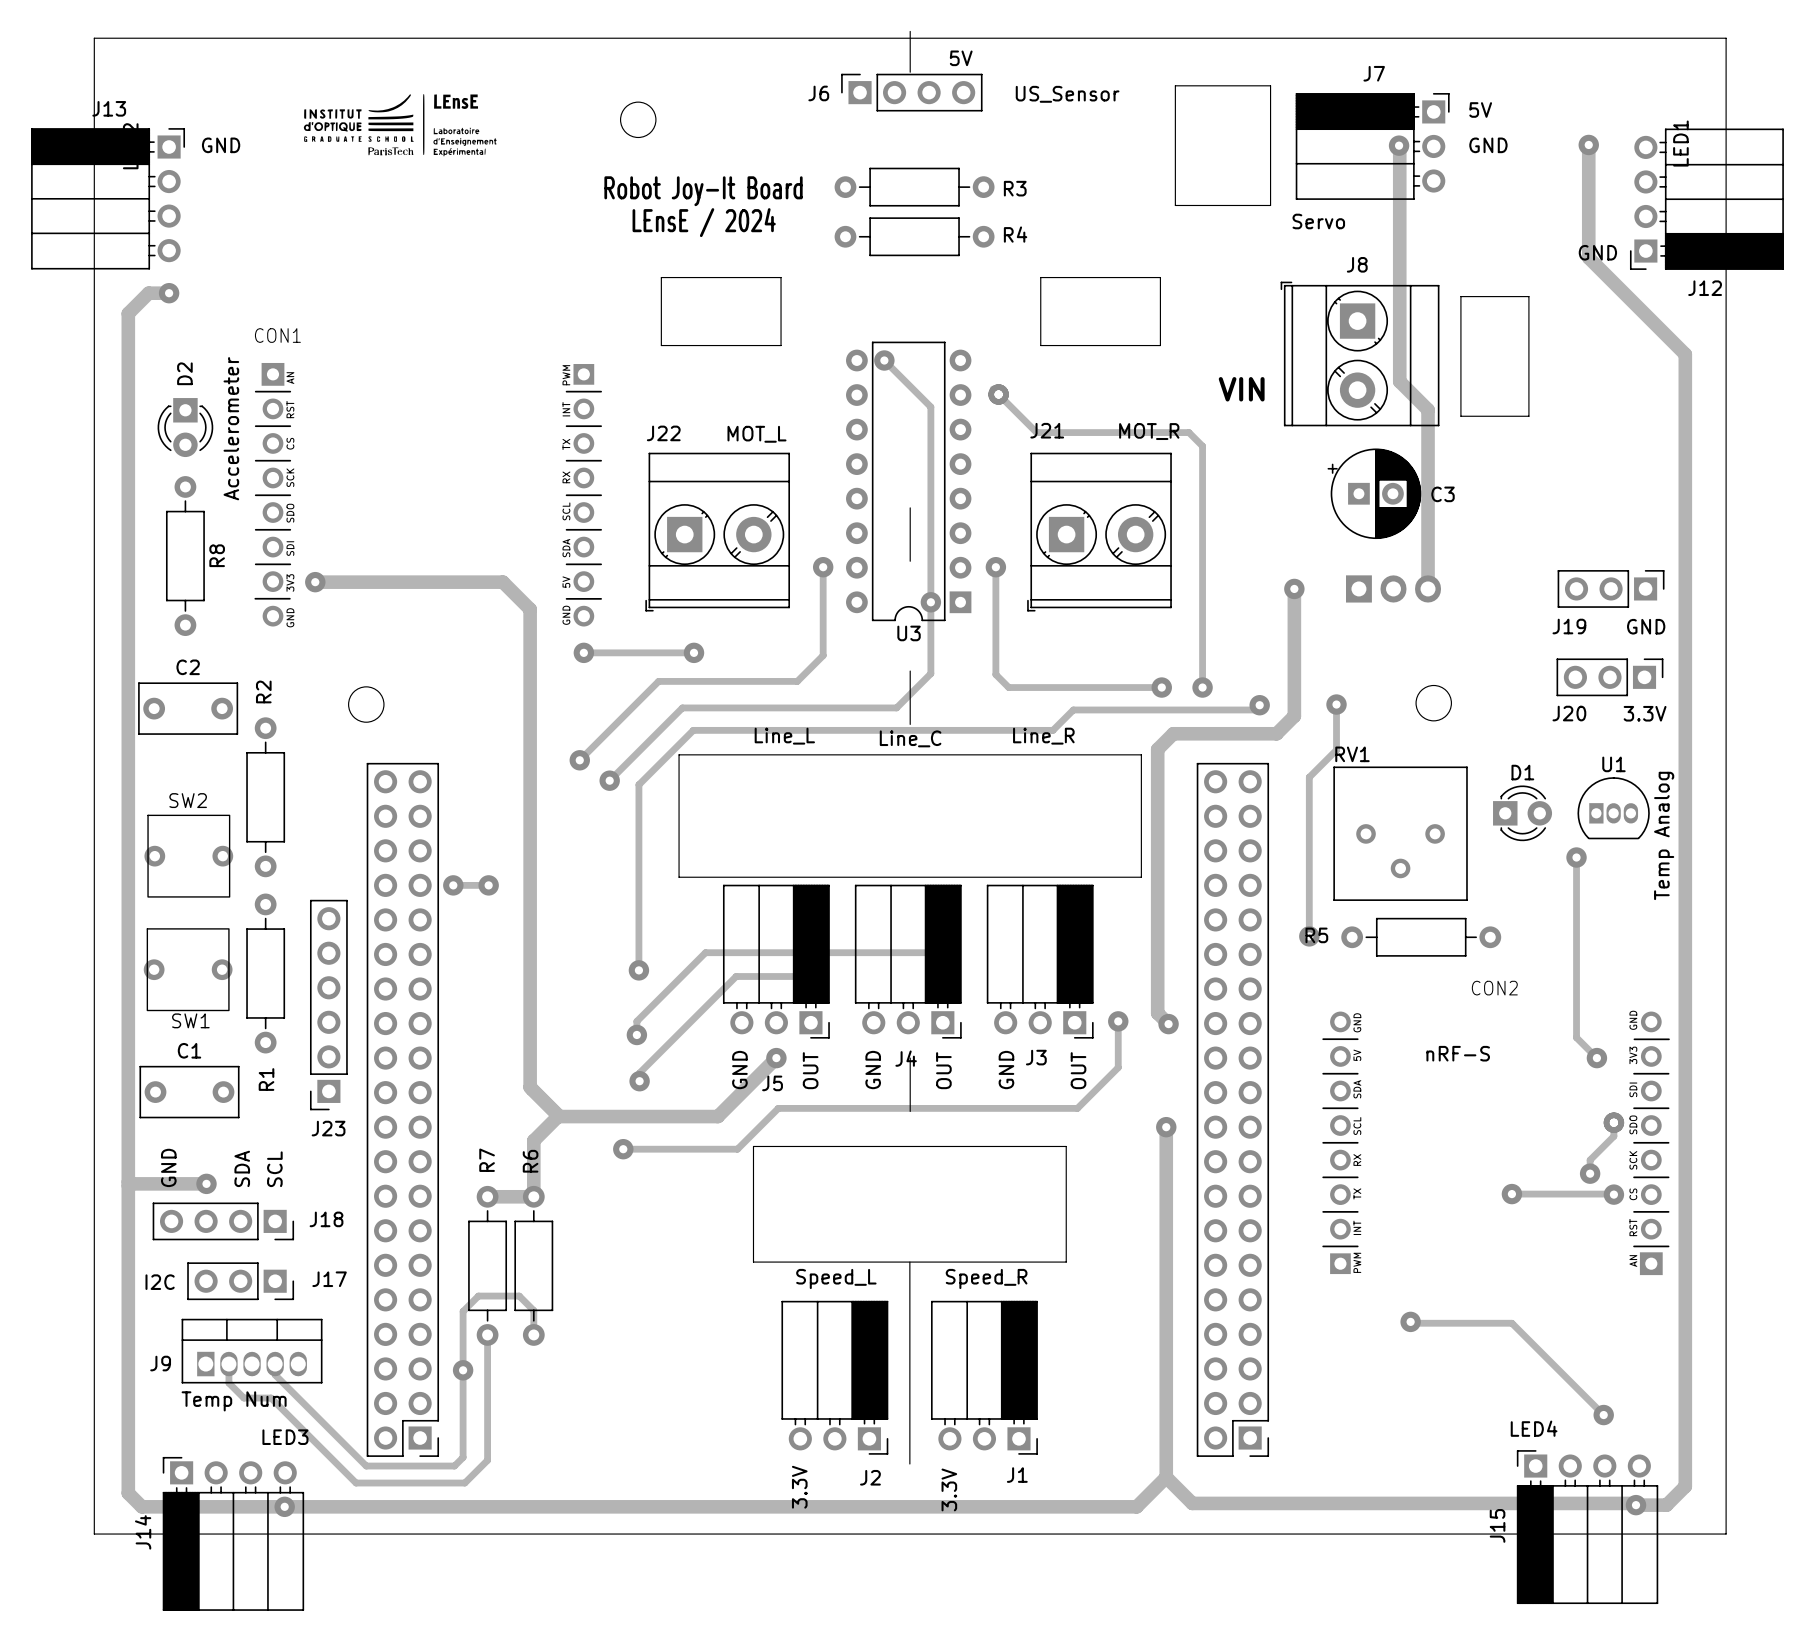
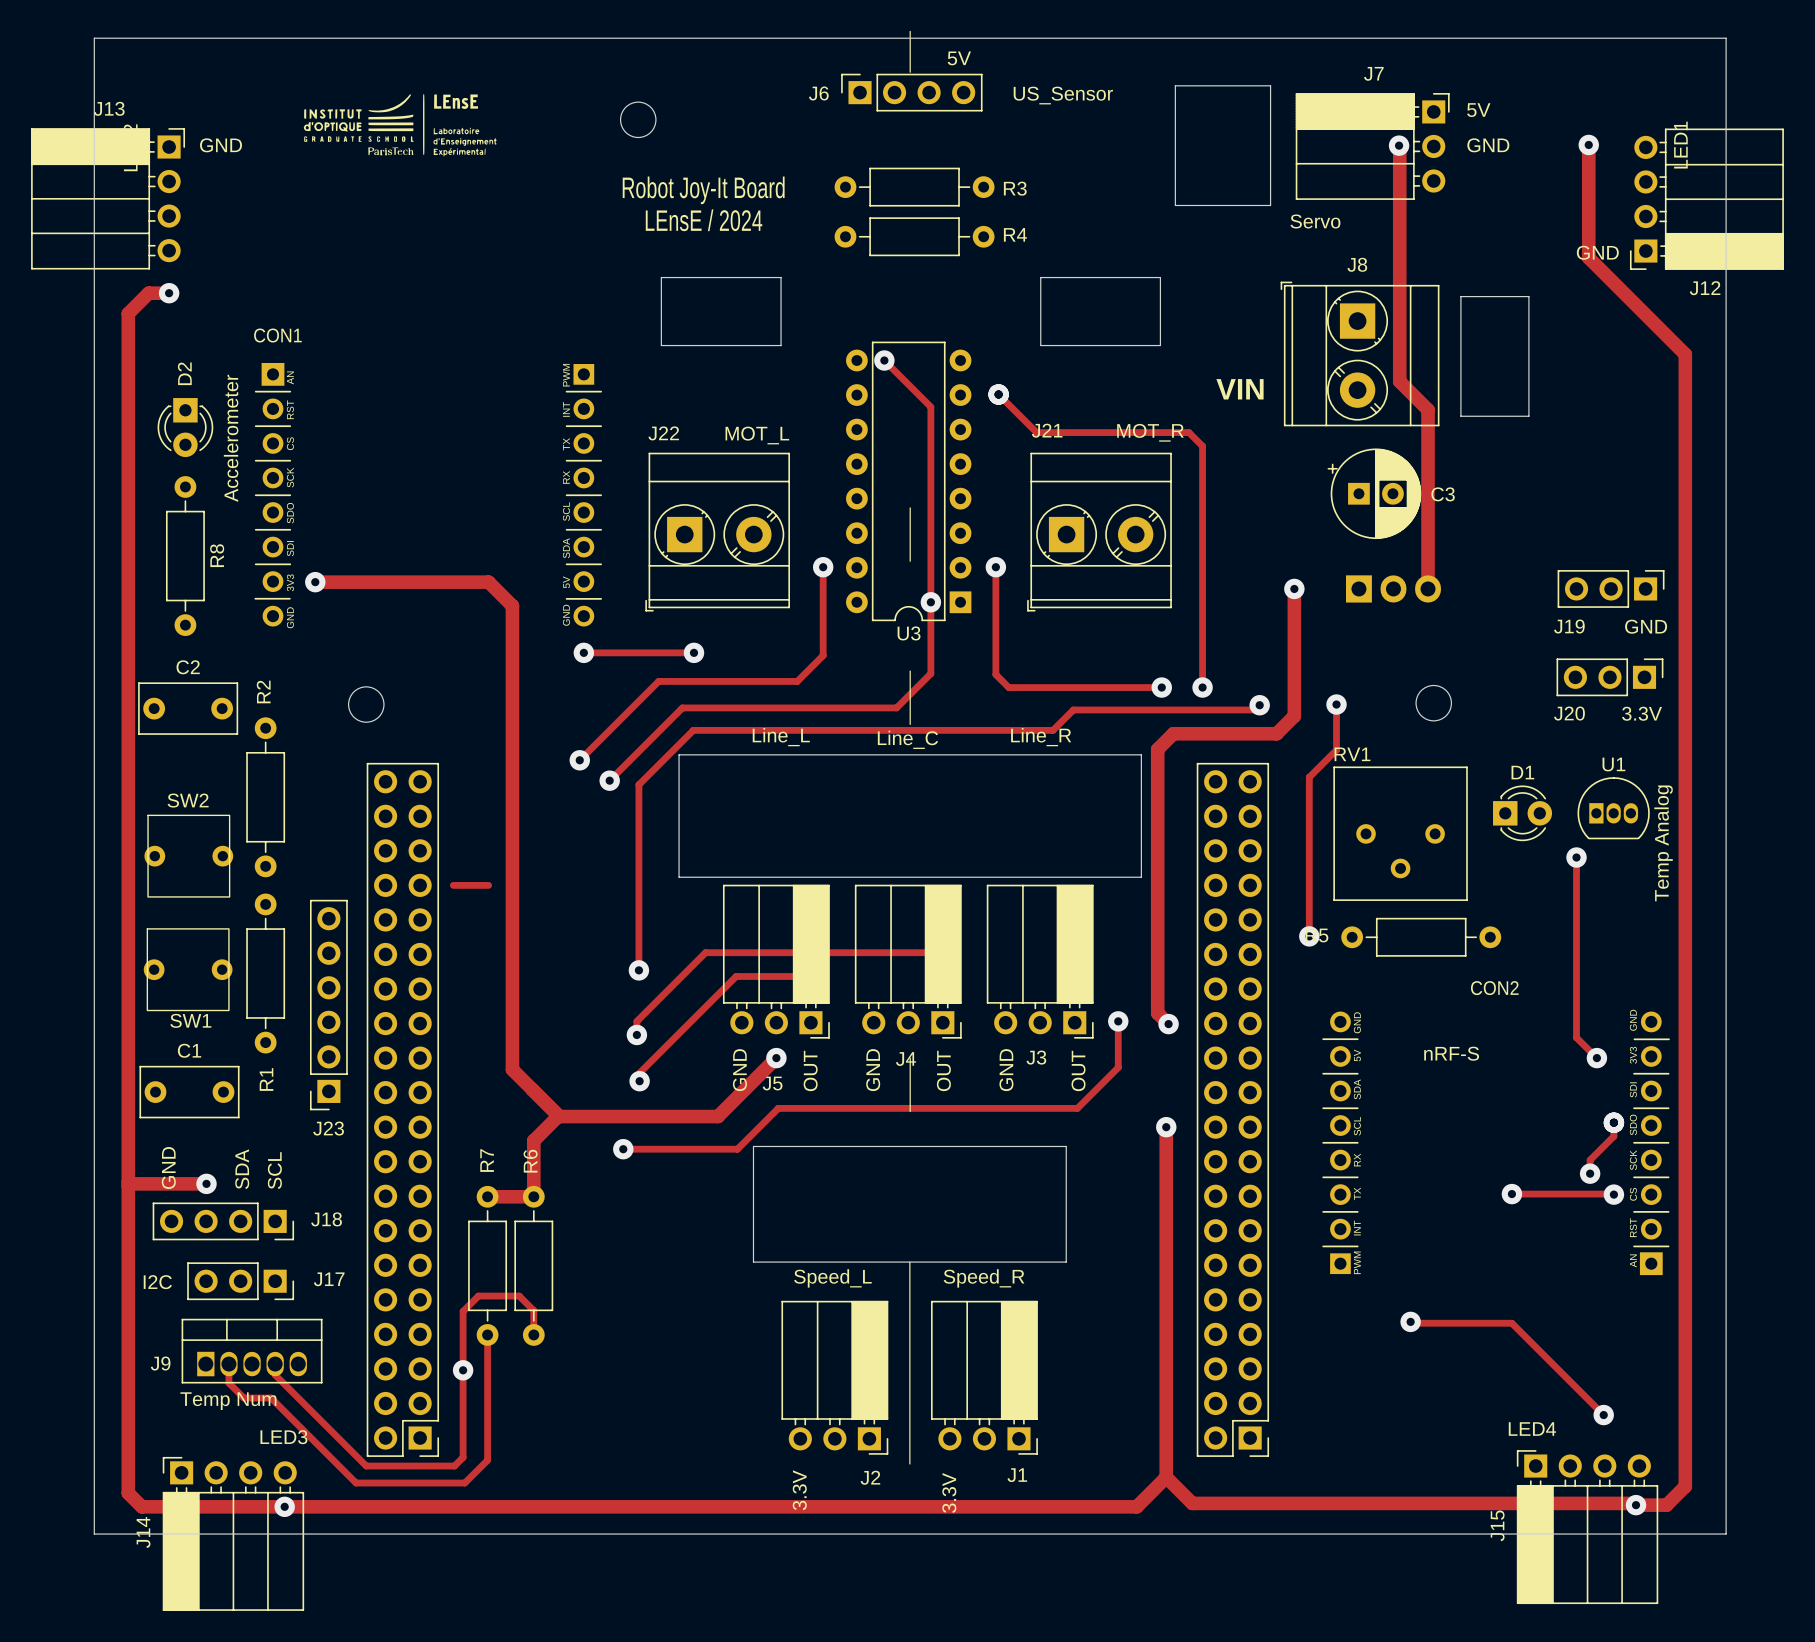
track: (488, 582) (502, 582) (530, 609) (530, 1087) -> (488, 582) (512, 605) (512, 1069) (530, 1087)
via: (453, 885) -> none
via: (488, 885) -> none

